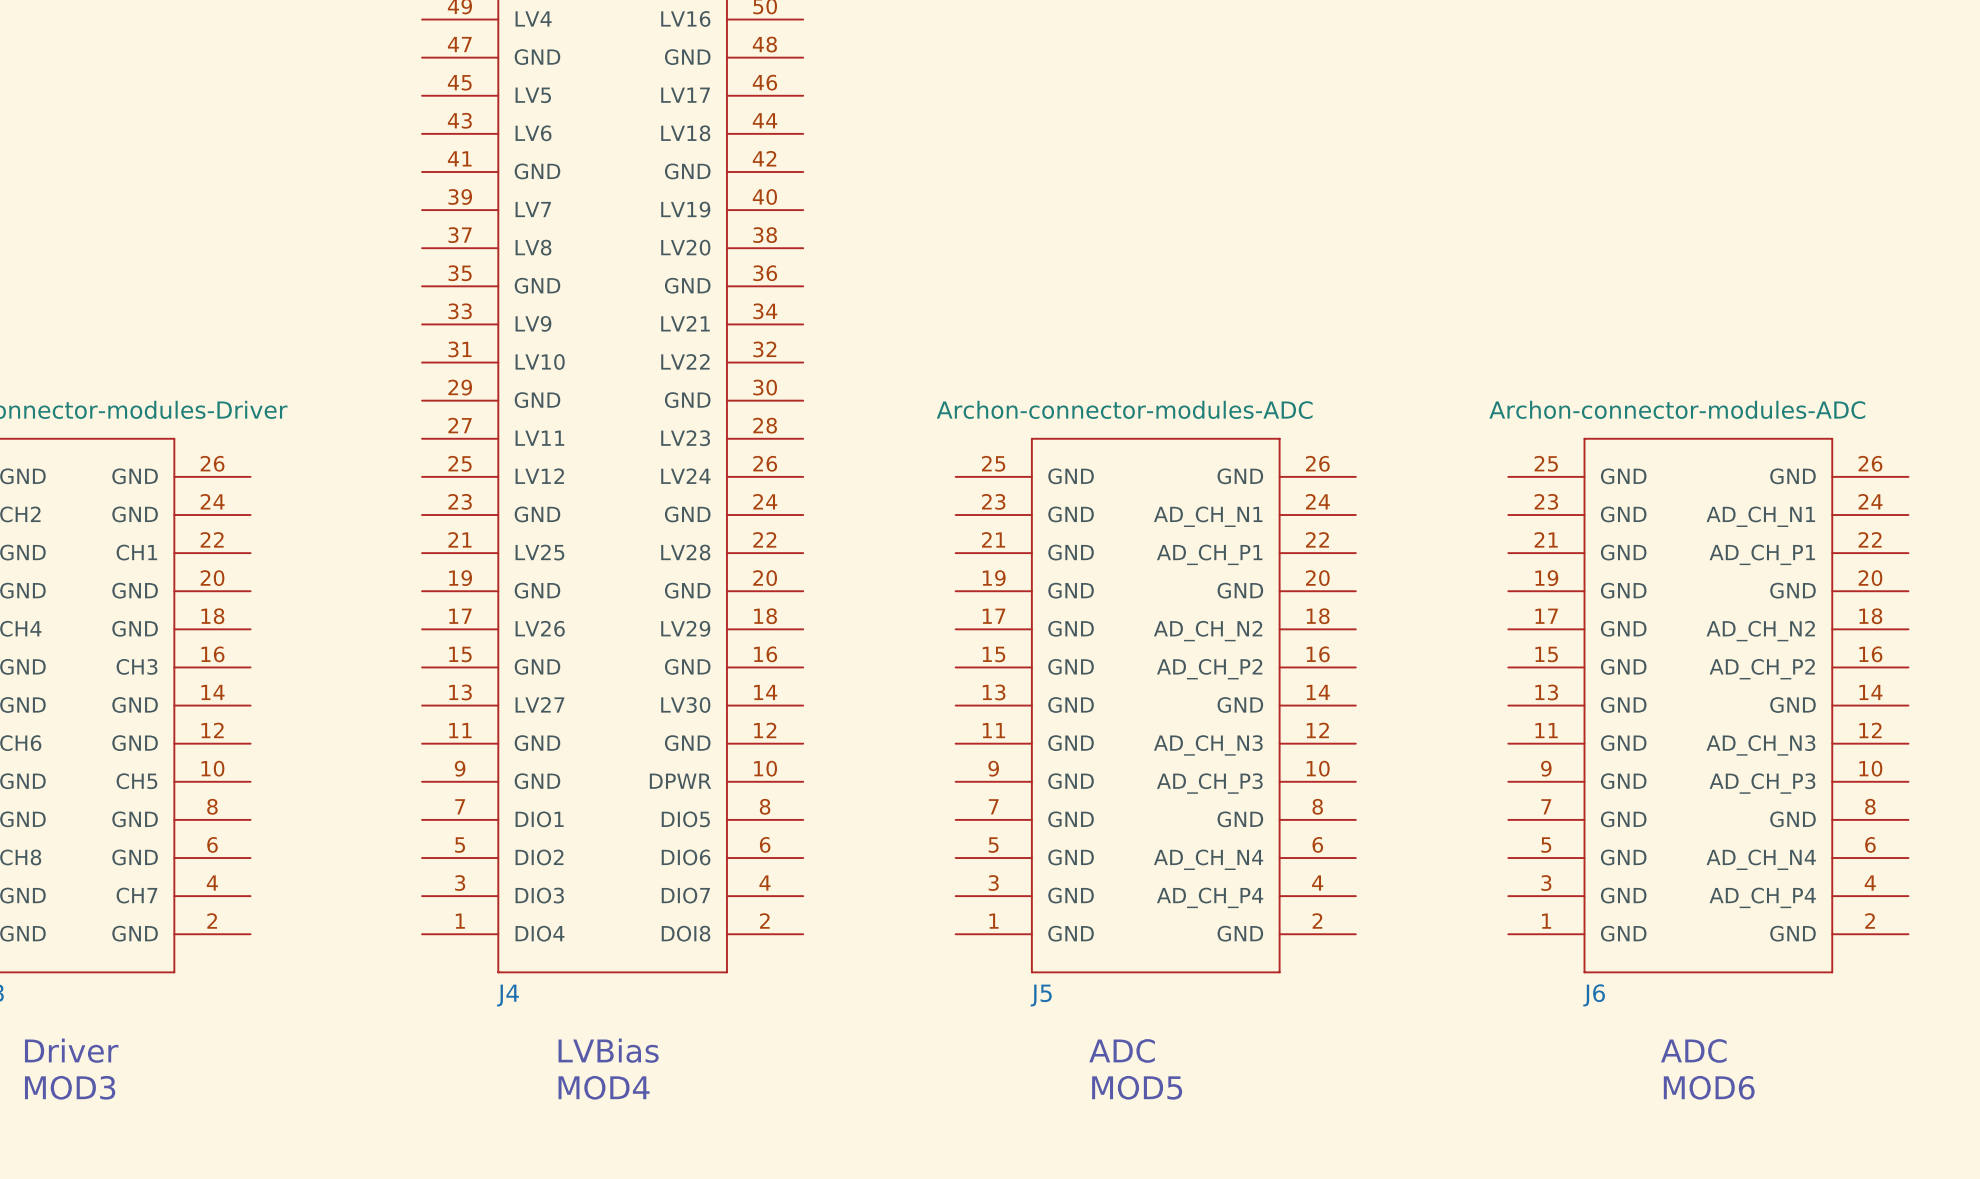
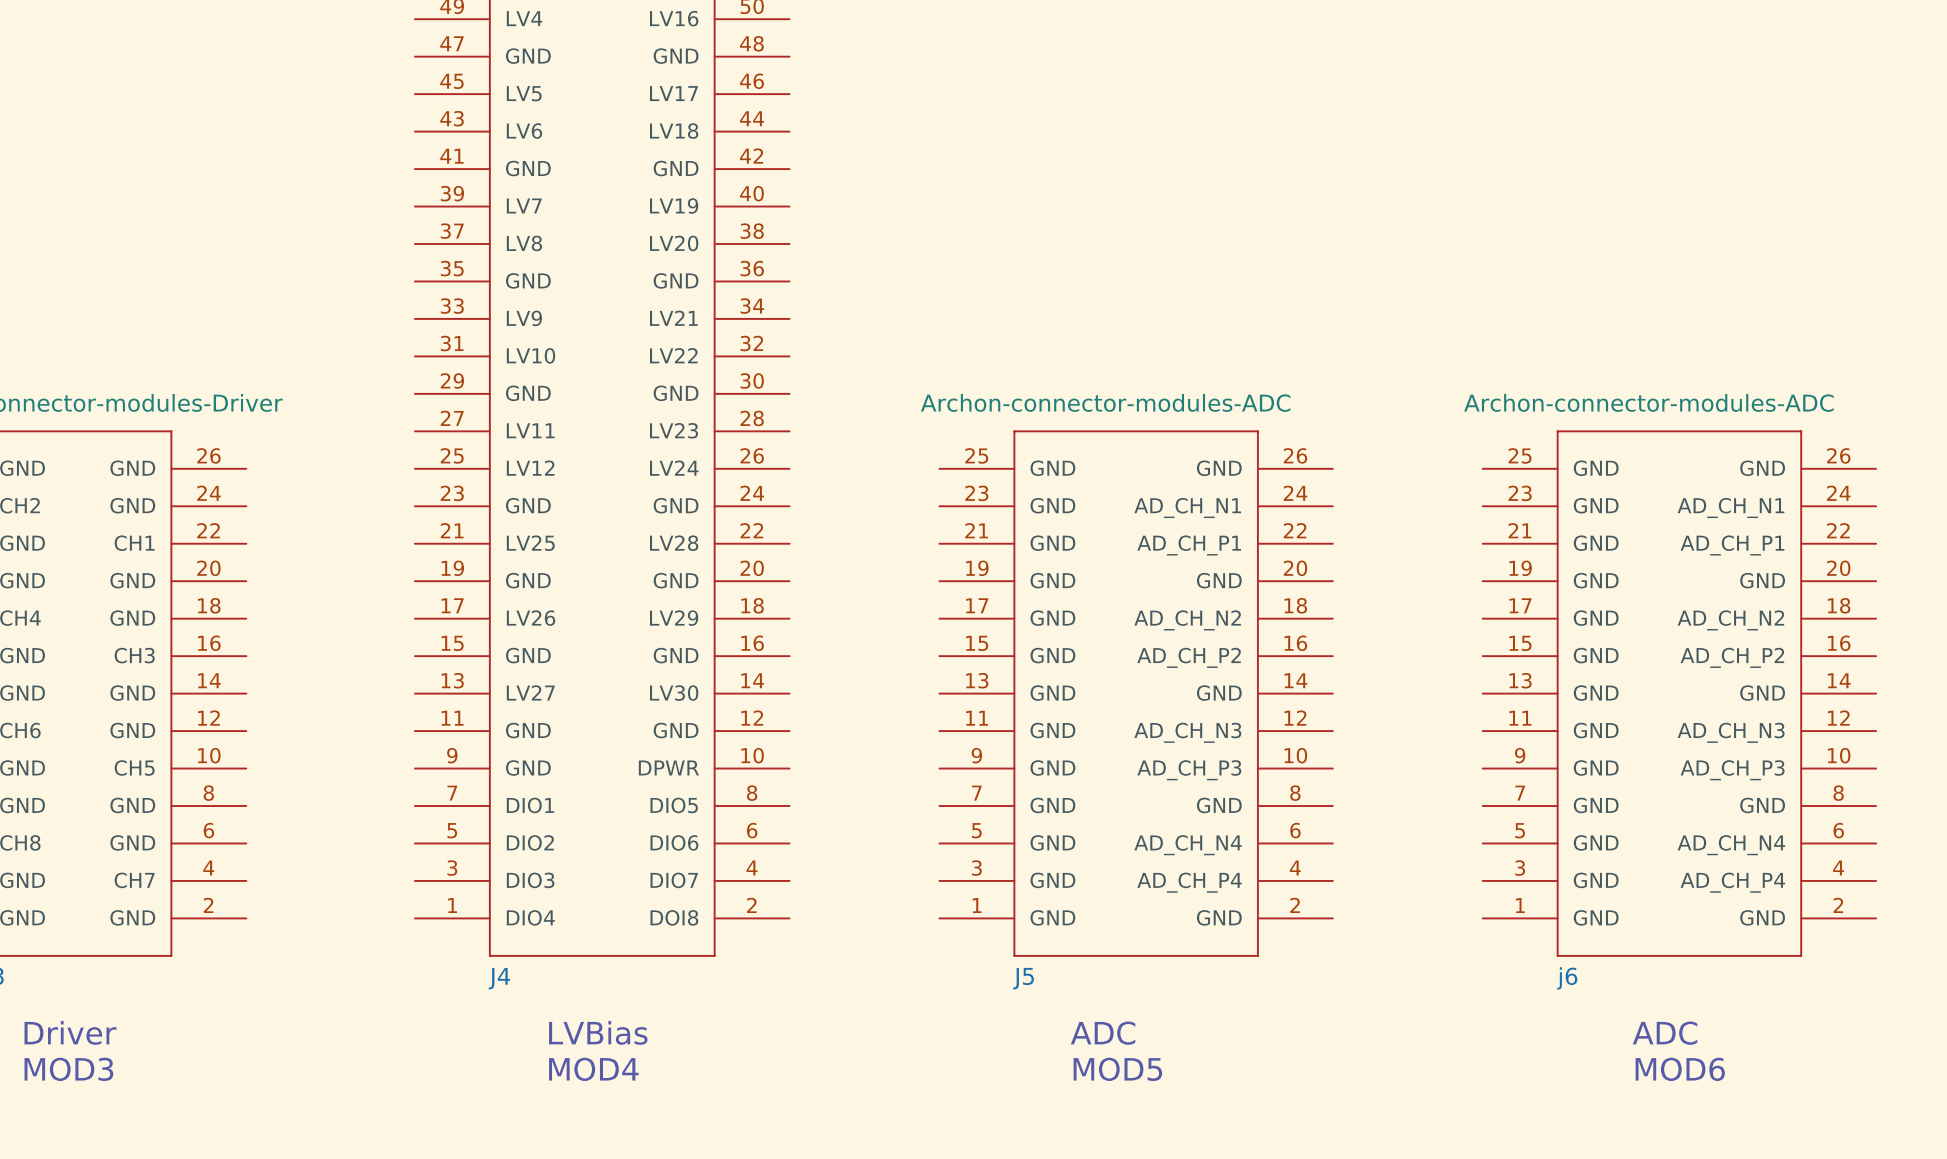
J6 name: J6 (1594, 995) -> j6 (1567, 978)

